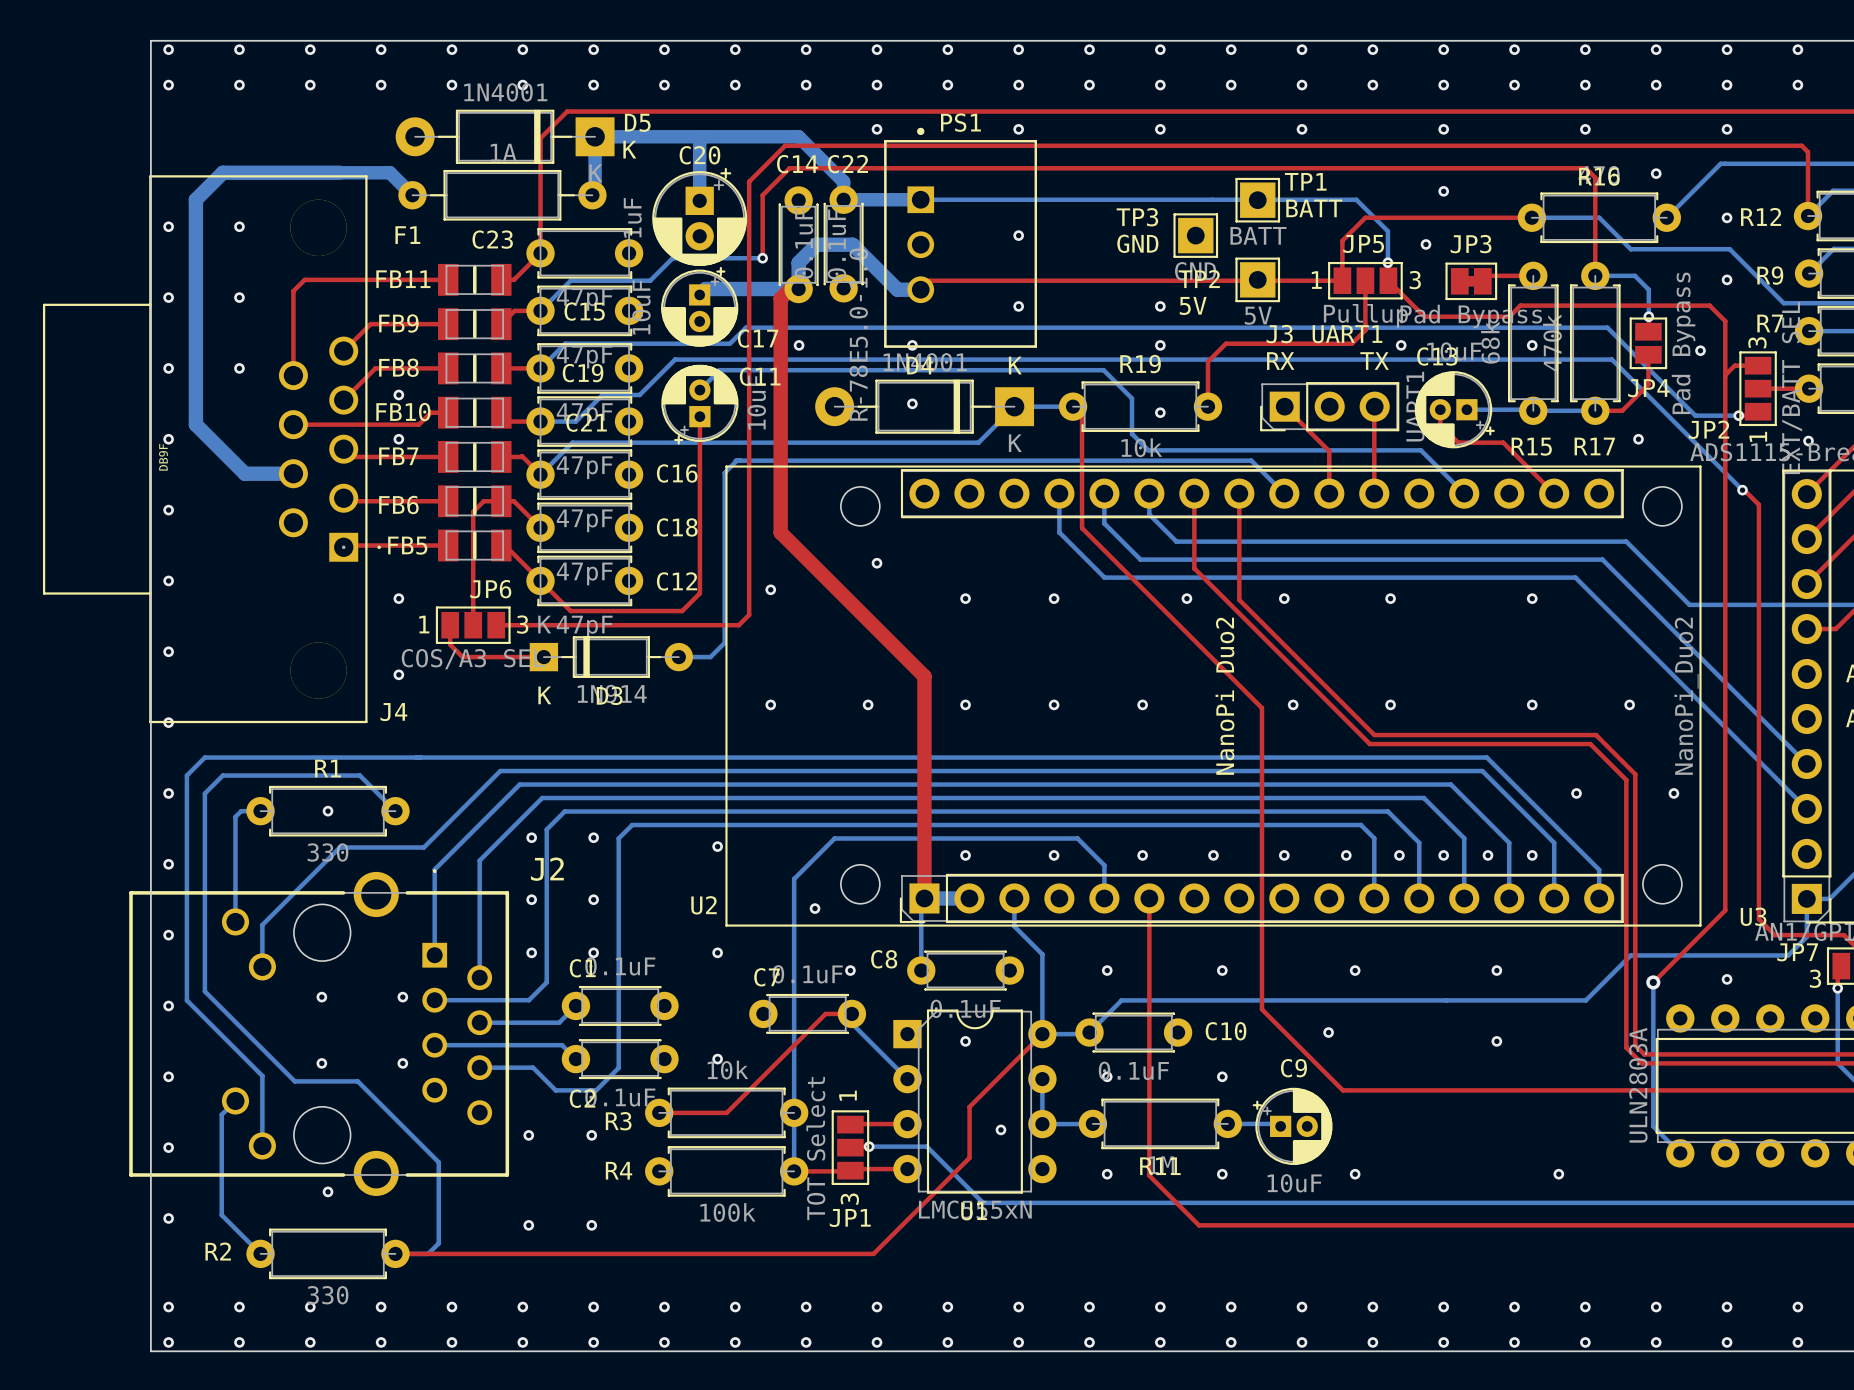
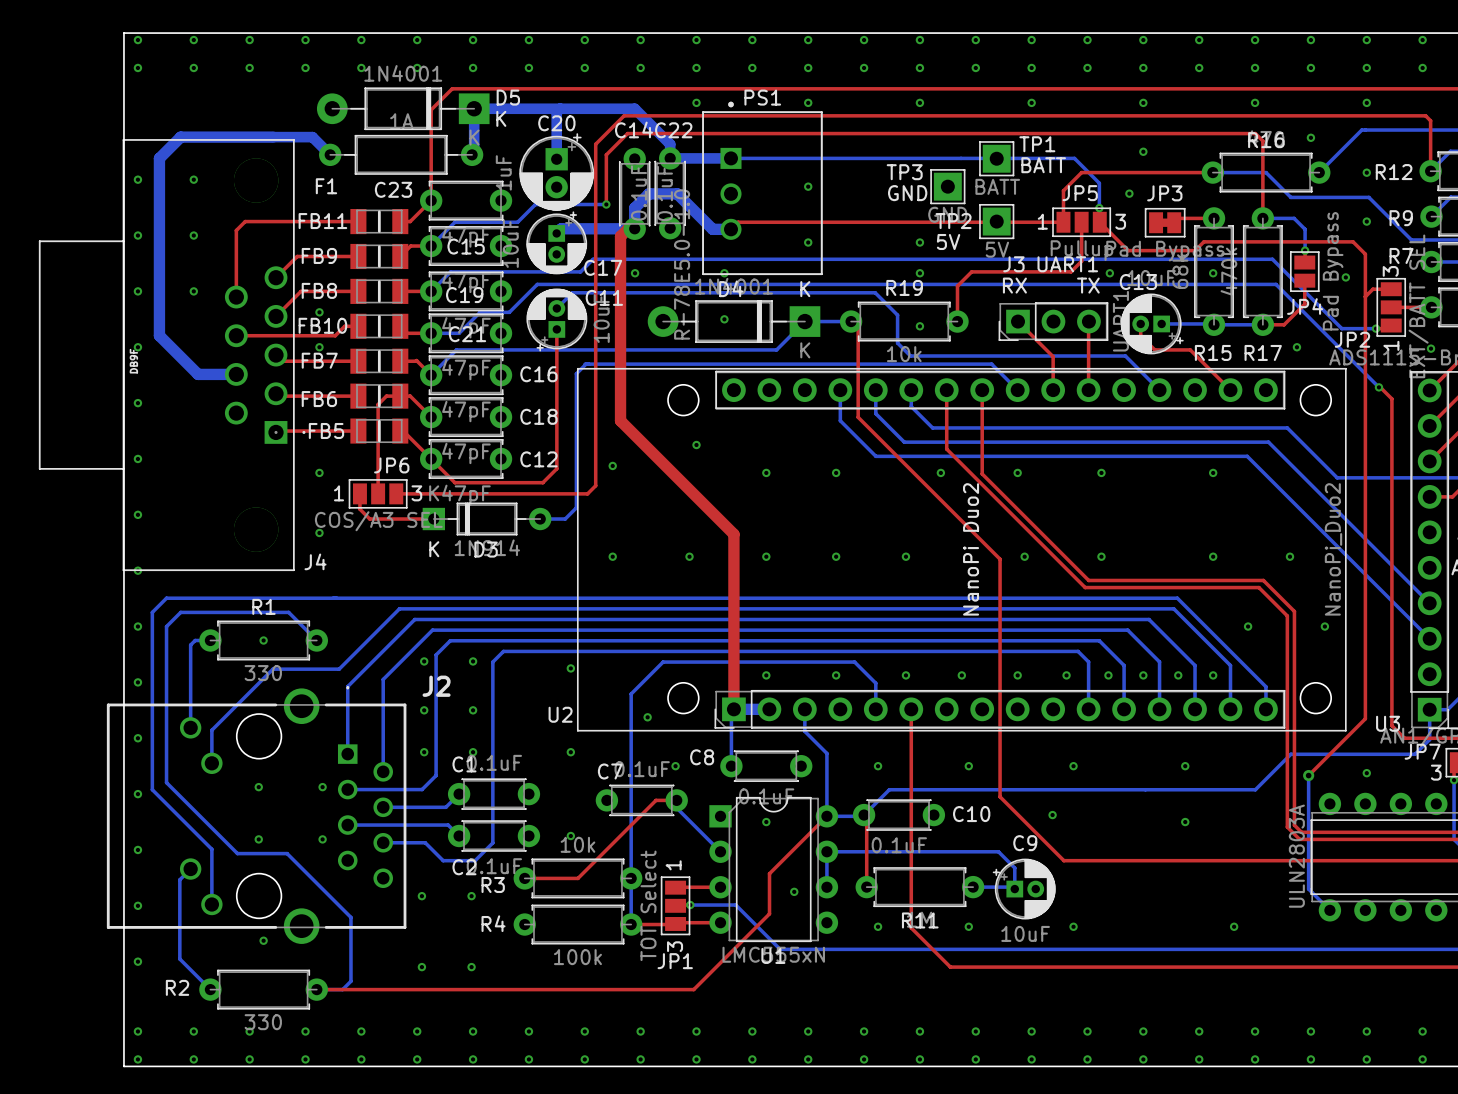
top track: none -> (864, 815) (866, 817) (866, 887)
via: (1107, 1076) -> none
via: (1222, 1076) -> none
bottom track: none -> (826, 851) (998, 851) (1014, 868) (1014, 889)
bottom track: (1042, 1124) (1092, 1124) -> none

